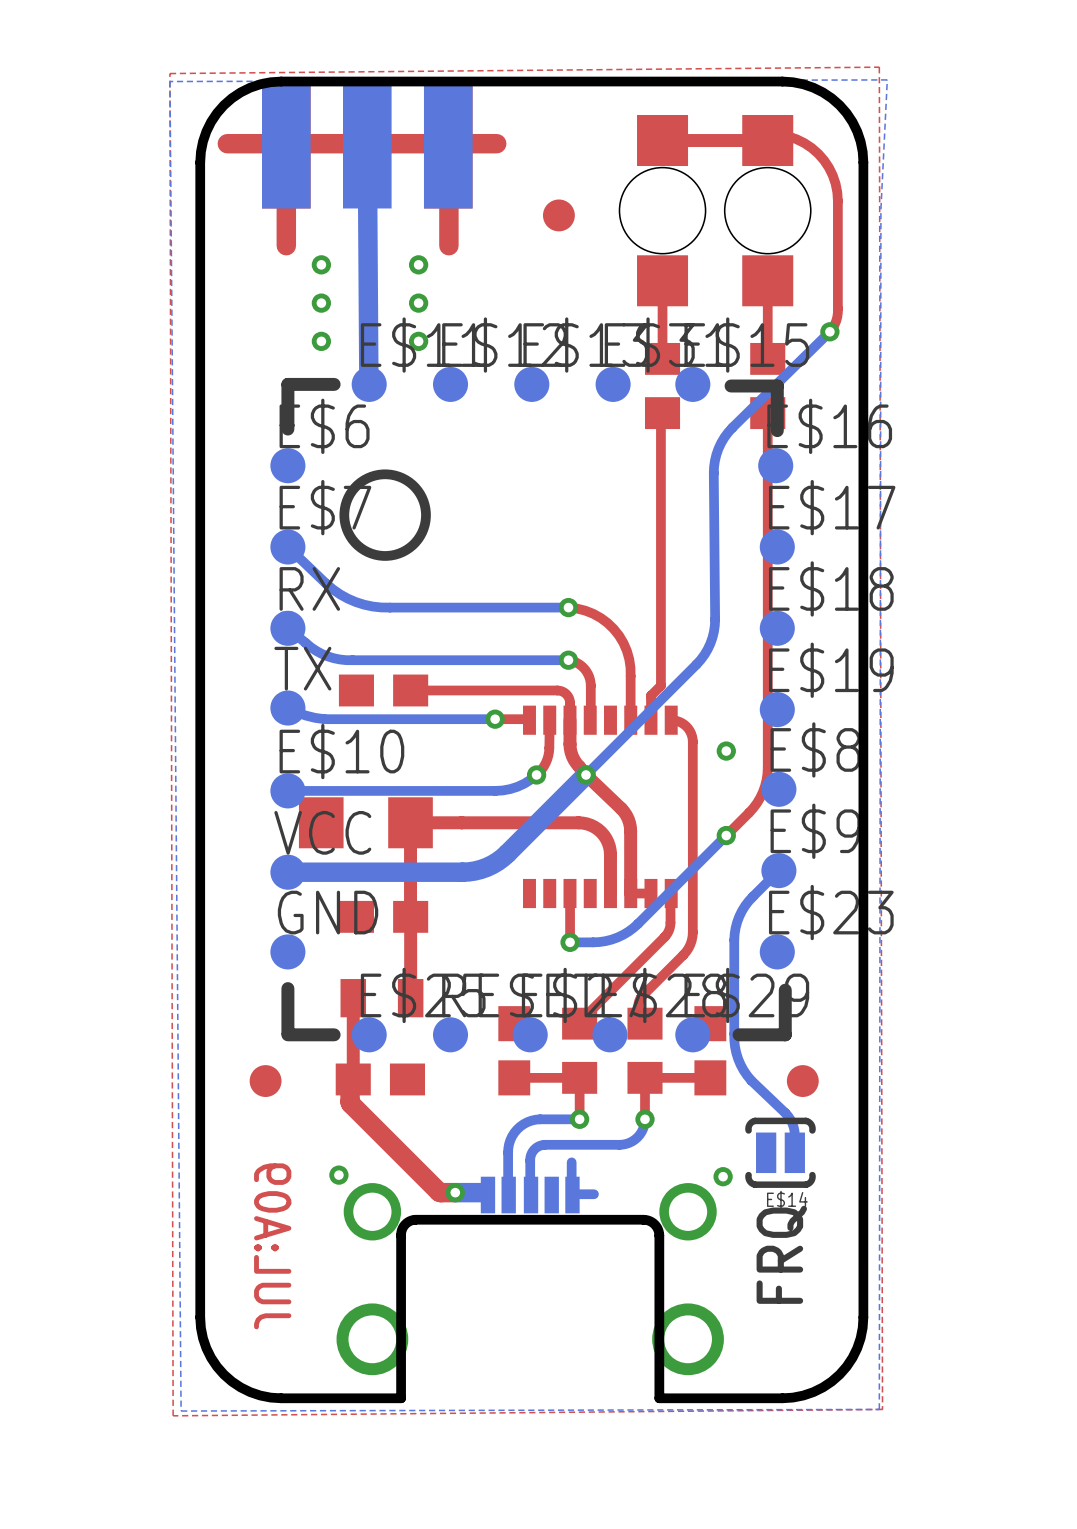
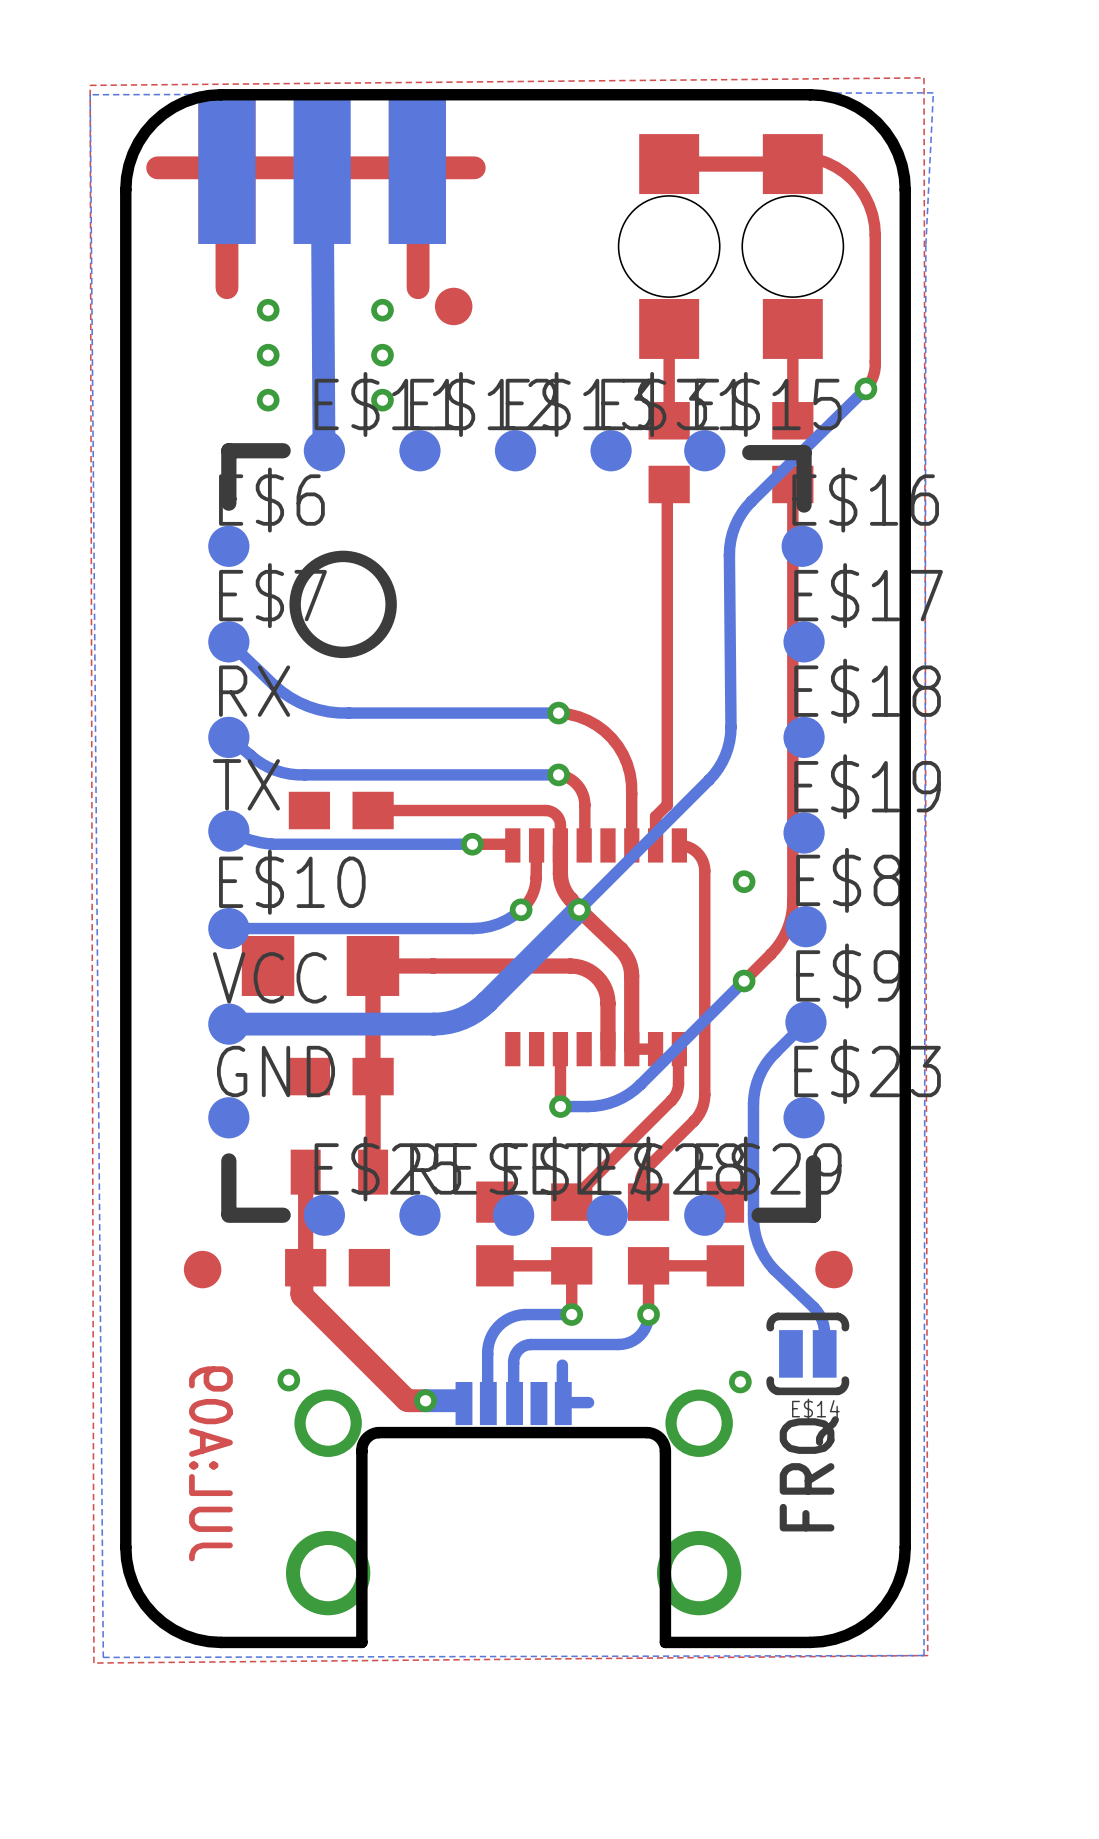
part position: (558, 215) -> (453, 306)

